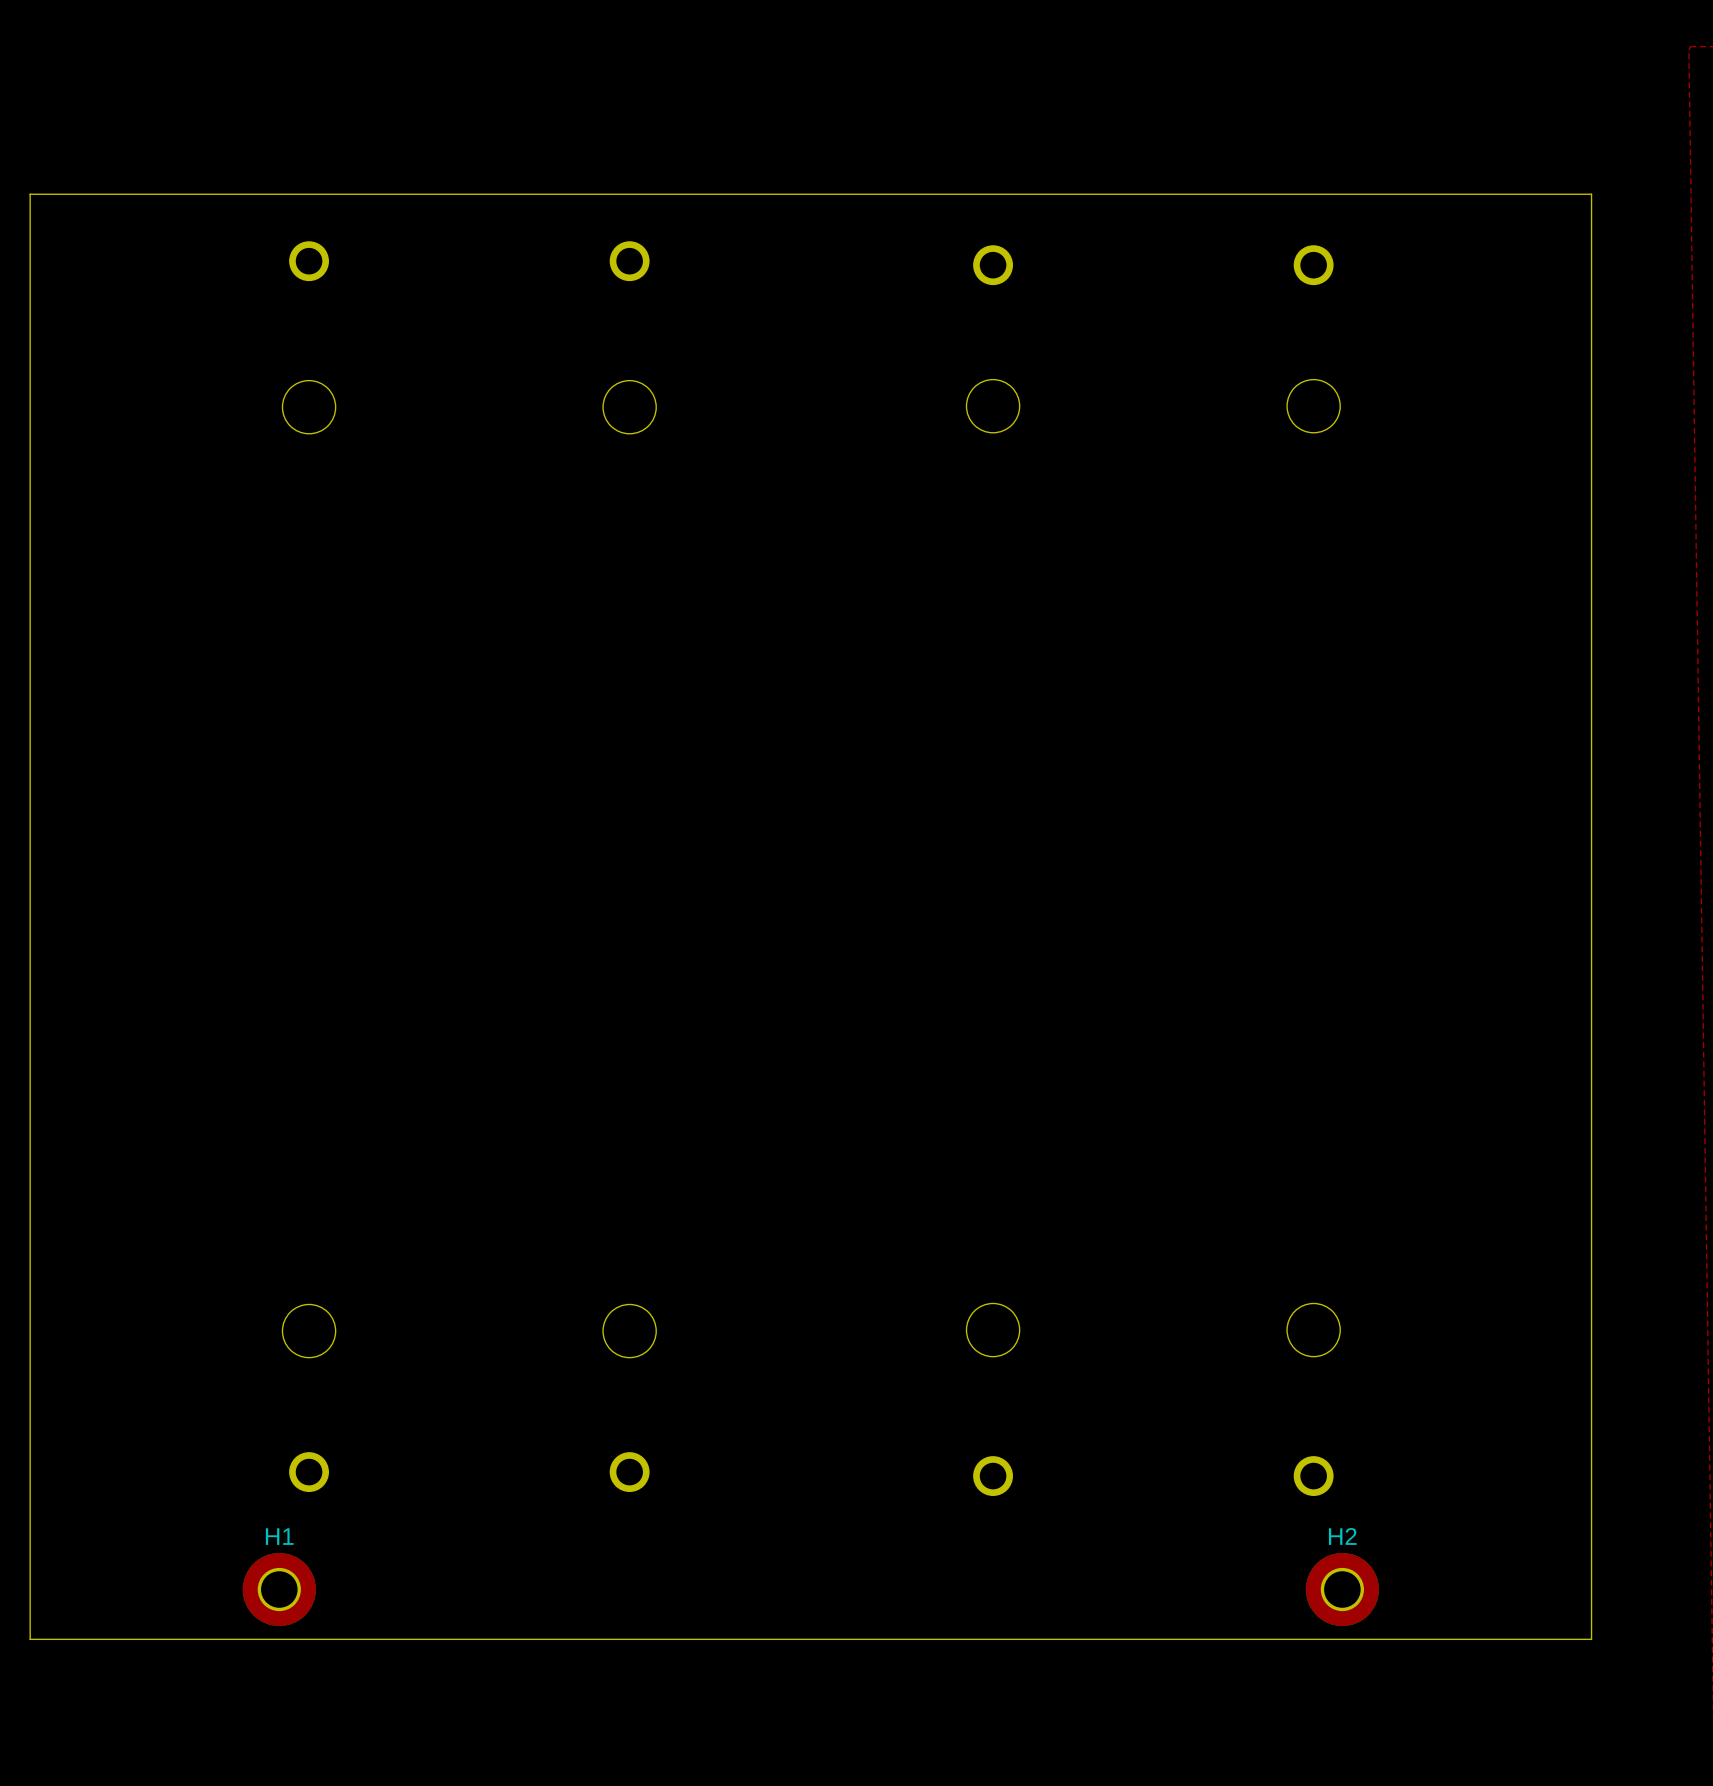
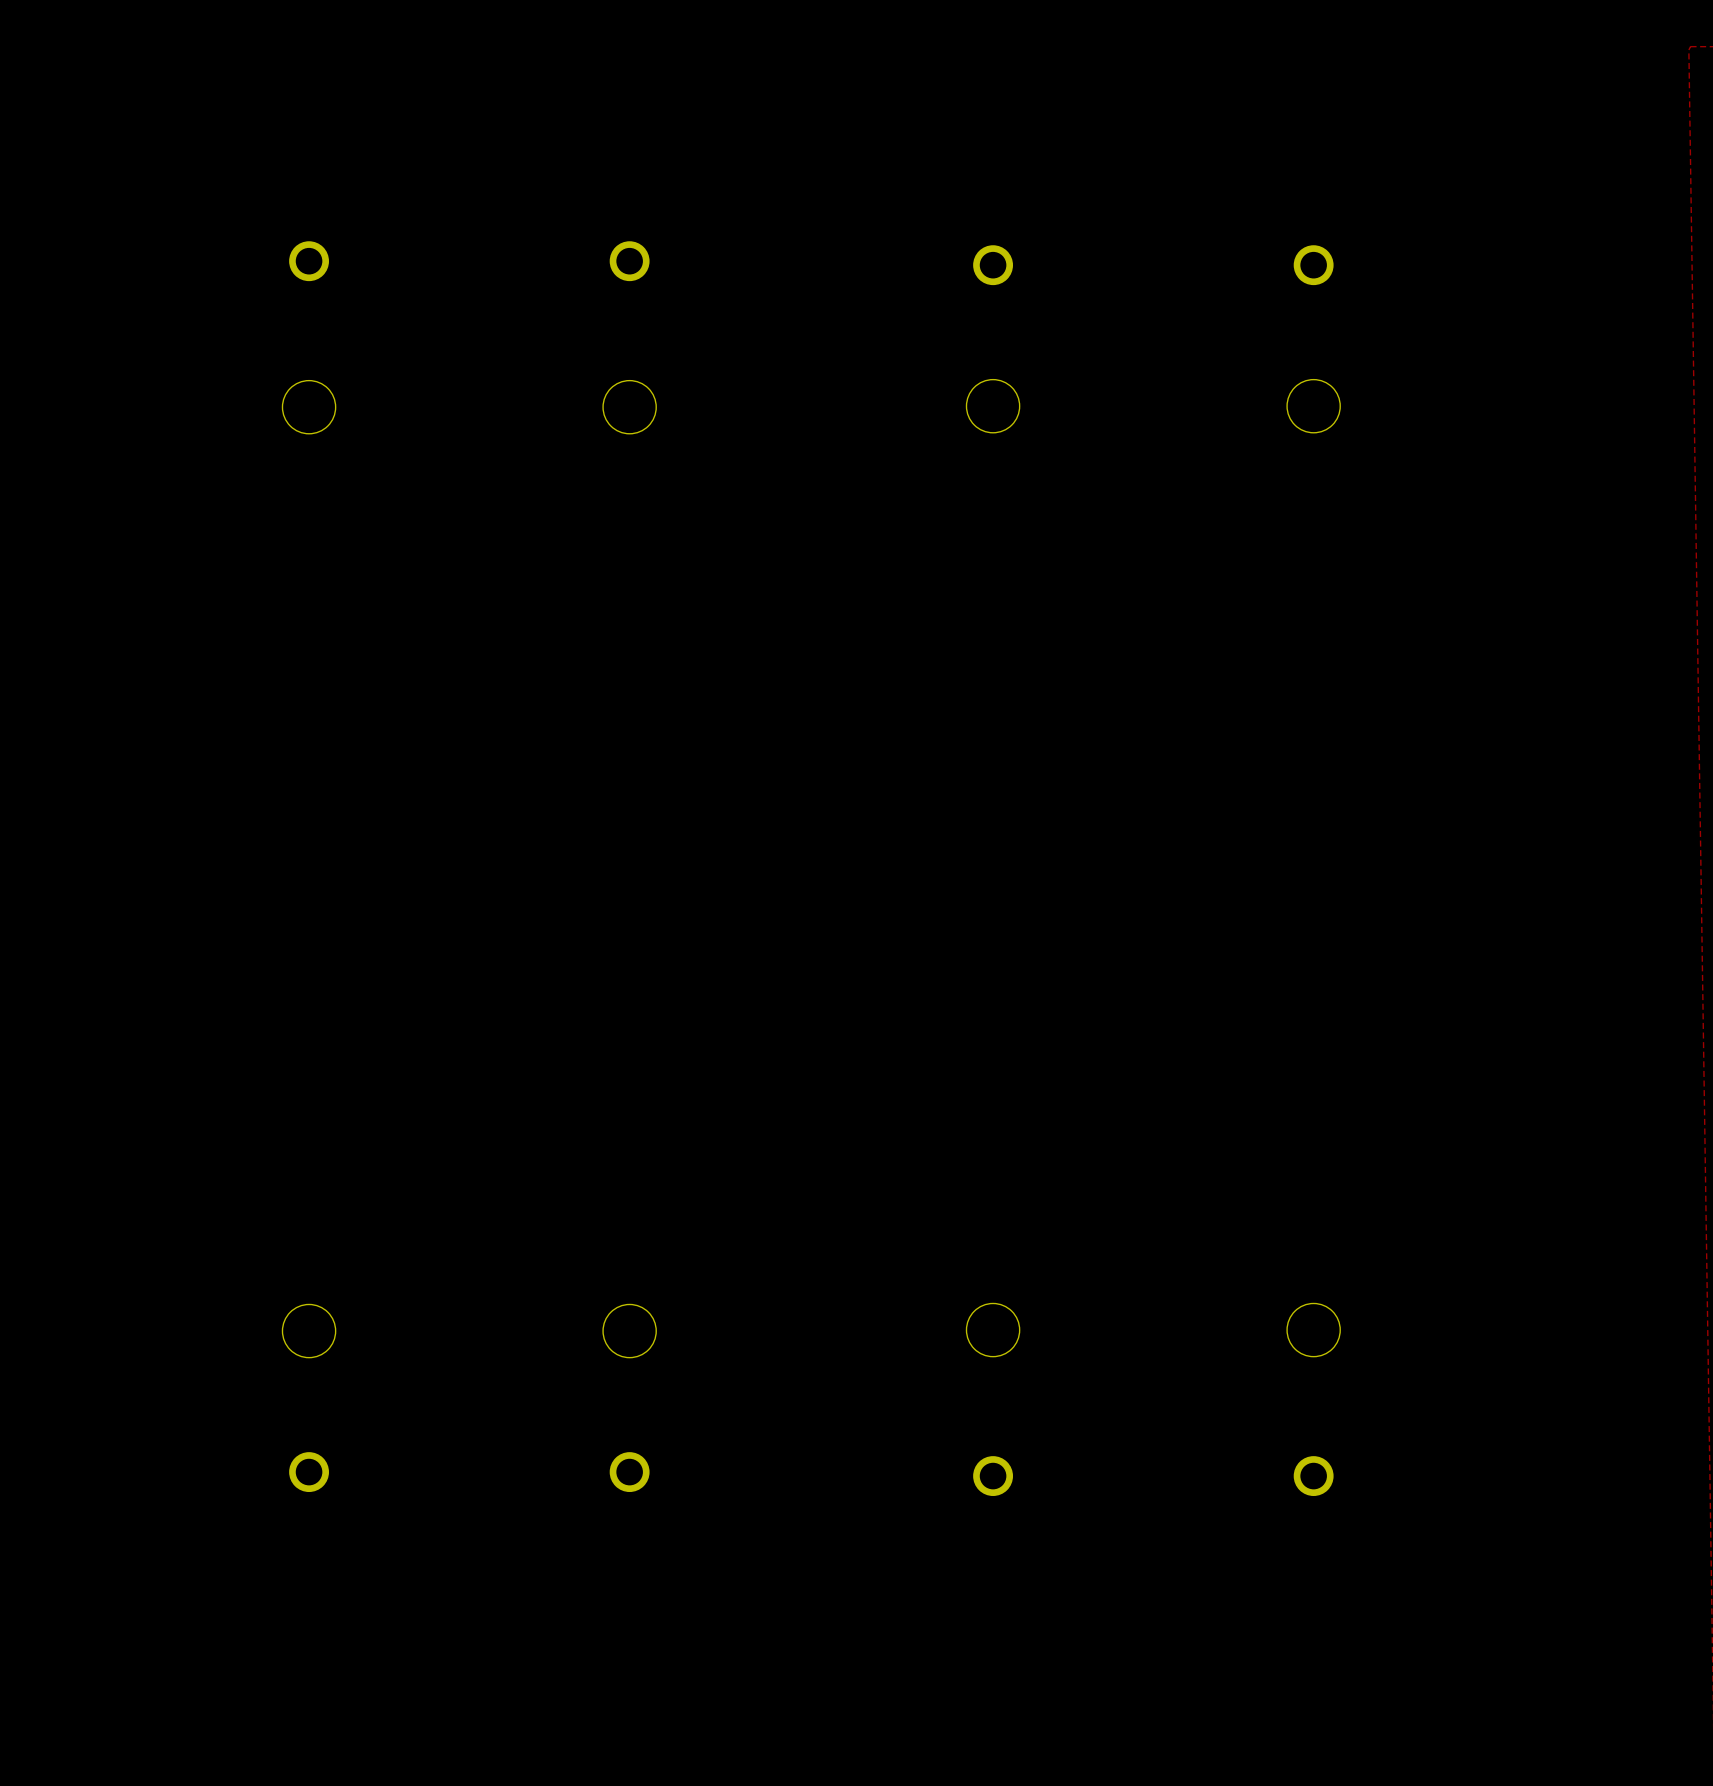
board edge: (30, 194) (1591, 194) (1591, 1639) (30, 1639) (30, 194) -> none
H1: (279, 1589) -> none
H2: (1342, 1589) -> none

